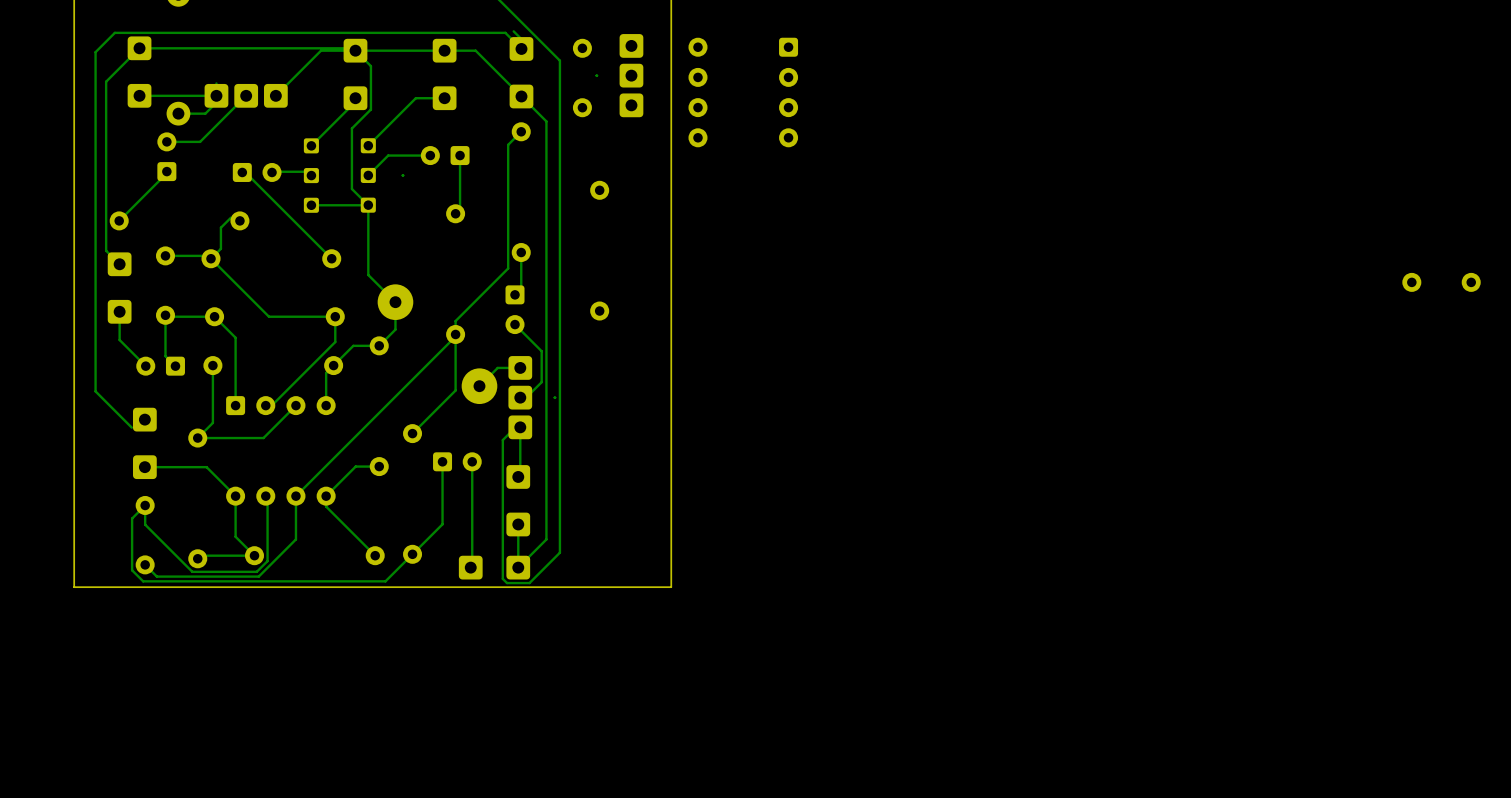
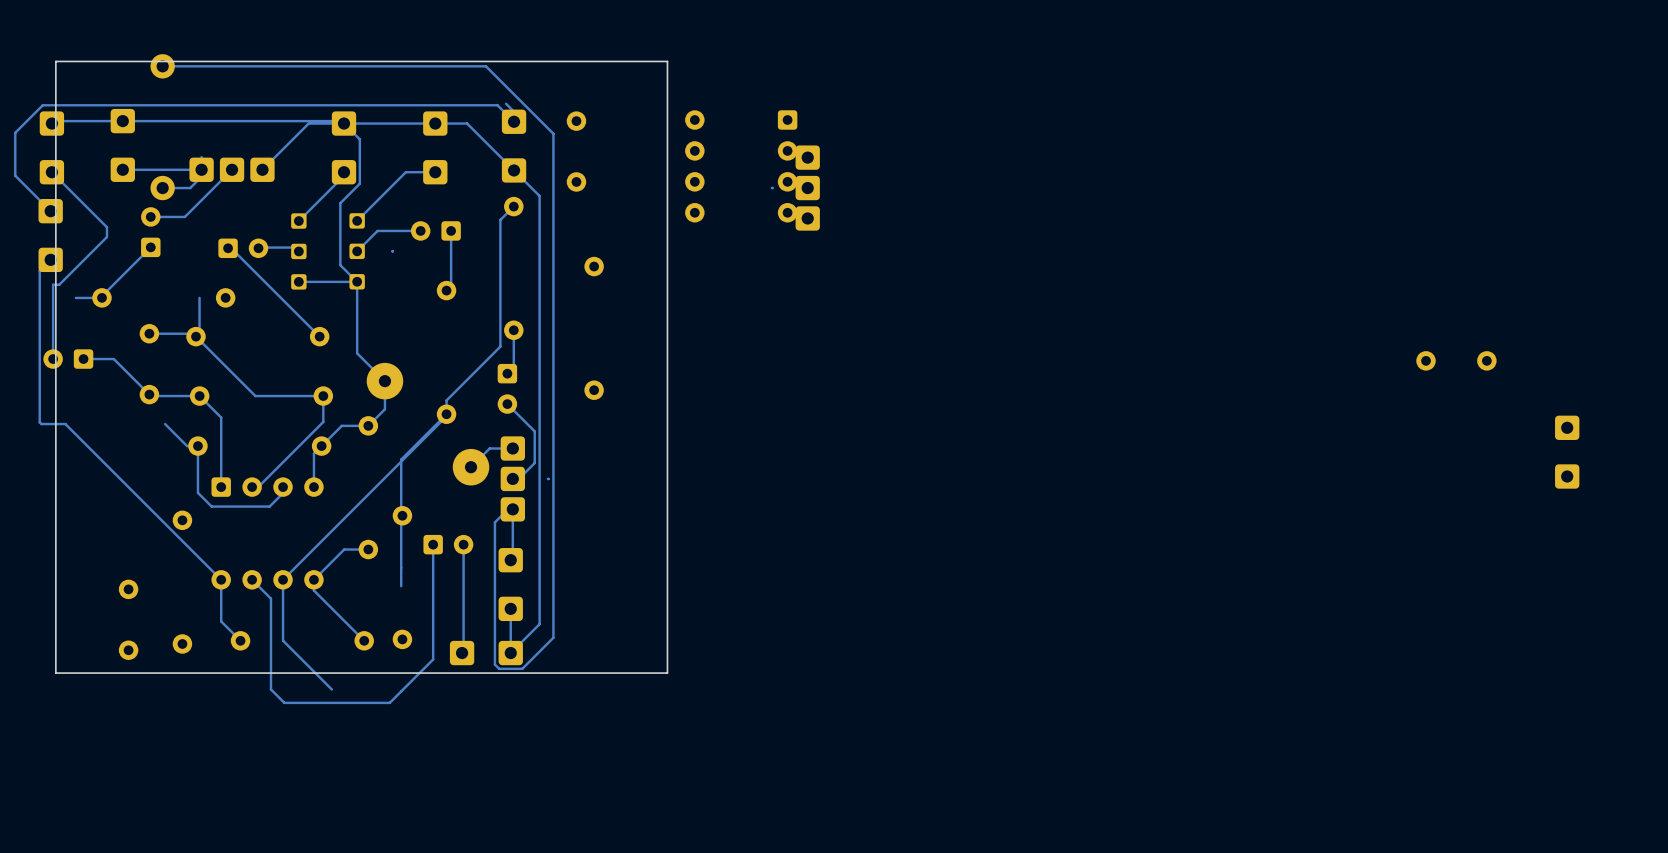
track: (114, 32) (95, 52) (95, 391) (131, 427) -> (97, 105) (42, 105) (15, 132) (15, 175) (50, 211)
track: (139, 48) (106, 81) (106, 250) (119, 264) -> (122, 121) (54, 121) (51, 123)
part: none -> (51, 147)
part position: (631, 75) -> (807, 188)
track: none -> (51, 172) (106, 227) (106, 237) (59, 284) (53, 284) (53, 359)
part: none -> (50, 235)
track: (166, 171) (119, 220) -> (150, 247) (100, 297) (75, 297)
track: (231, 217) (220, 227) (220, 248) (214, 255) -> (199, 297) (199, 333)
part: (119, 288) -> none
track: (119, 311) (119, 340) (145, 366) -> none
track: (165, 315) (165, 356) (175, 366) -> (149, 394) (113, 359) (83, 359)
track: none -> (446, 414) (401, 459) (401, 586)
track: (455, 336) (455, 390) (412, 433) -> none
track: none -> (165, 424) (187, 446) (197, 446)
part position: (160, 366) -> (68, 359)
track: (295, 405) (263, 438) (197, 438) (212, 422) (212, 411) -> (283, 493) (269, 506) (211, 506) (197, 492)
part: (144, 443) -> none
track: (206, 467) (144, 467) -> (191, 550) (65, 424) (41, 424) (39, 422) (39, 270) (50, 259)
track: (267, 497) (267, 561) (256, 571) (192, 571) (145, 524) (145, 505) (132, 518) (132, 570) (143, 581) (385, 581) (442, 524) -> (253, 581) (270, 598) (270, 689) (284, 702) (389, 702) (433, 659) (433, 608)
track: (295, 539) (258, 576) (156, 576) (145, 564) -> (283, 624) (283, 640) (331, 689)
track: (254, 555) (200, 555) (197, 558) -> none

